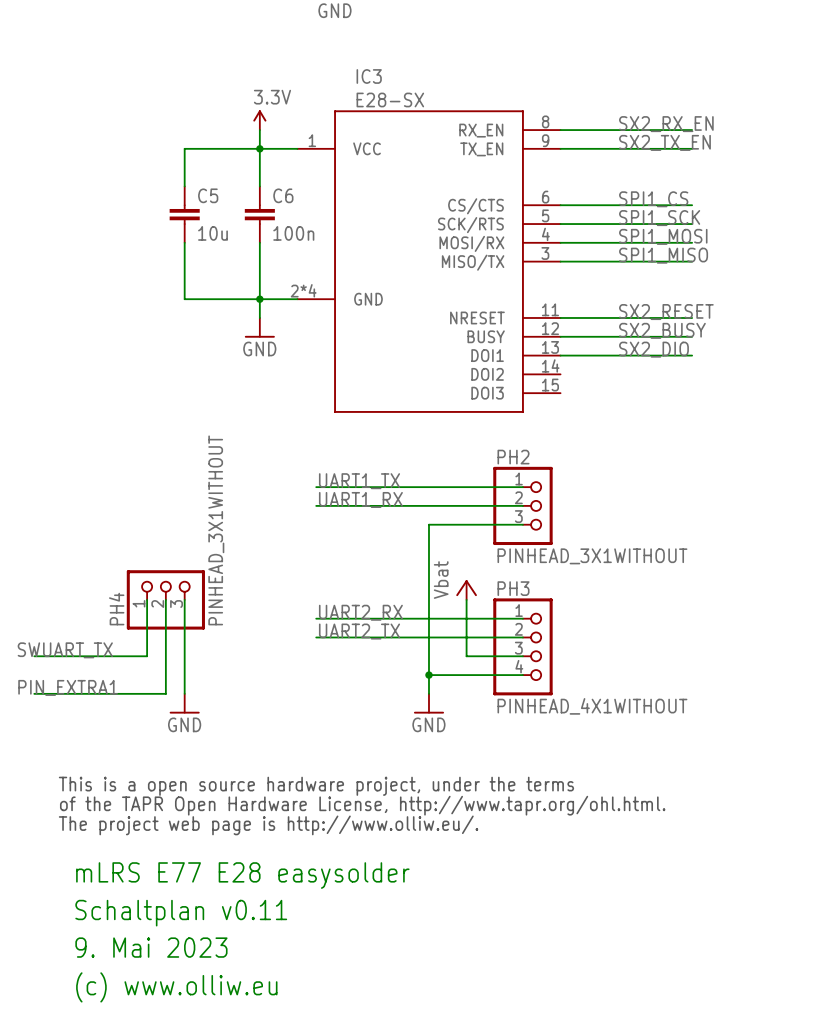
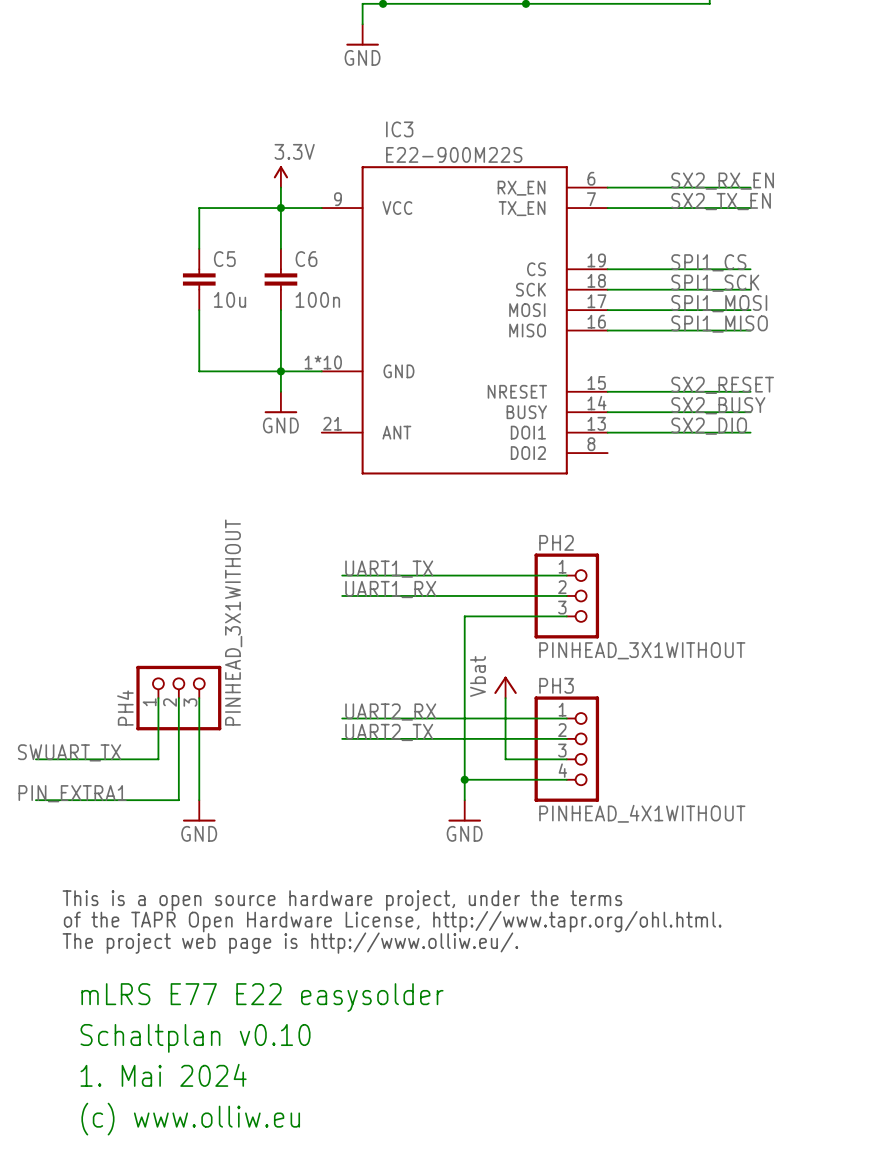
IC3 value: E28-SX (390, 99) -> E22-900M22S (454, 154)
IC3 symbol: [297, 110, 561, 413] -> [321, 166, 608, 475]
text: mLRS E77 E28 easysolder (242, 875) -> mLRS E77 E22 easysolder (262, 997)
text: Schaltplan v0.11 (181, 913) -> Schaltplan v0.10 (195, 1038)
text: 9. Mai 2023 (151, 947) -> 1. Mai 2024 (163, 1075)

